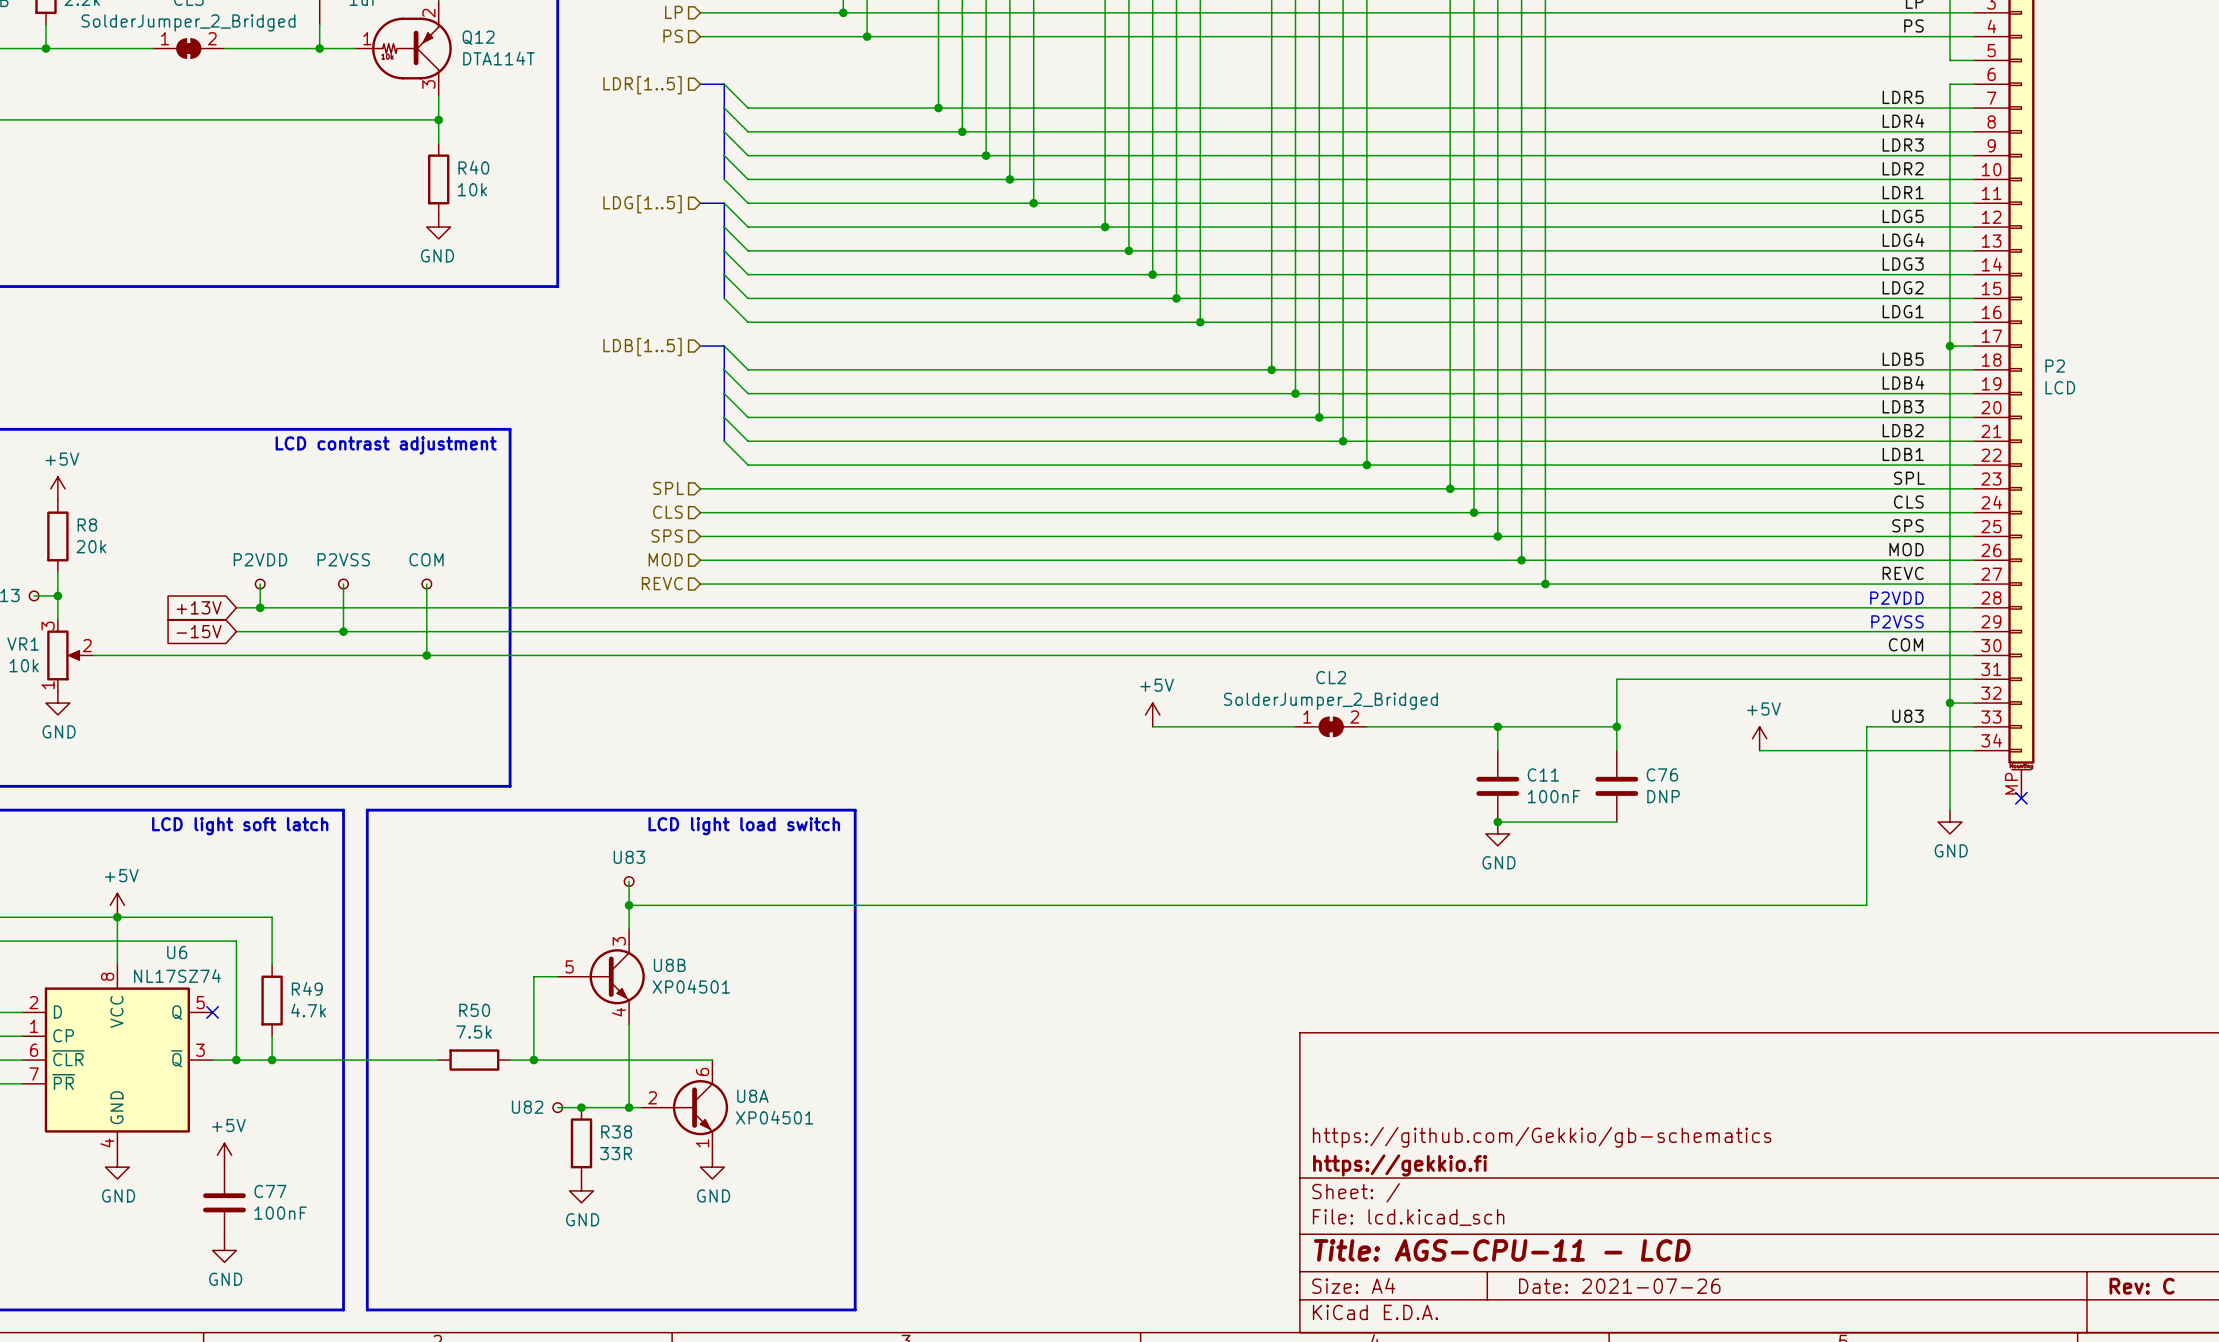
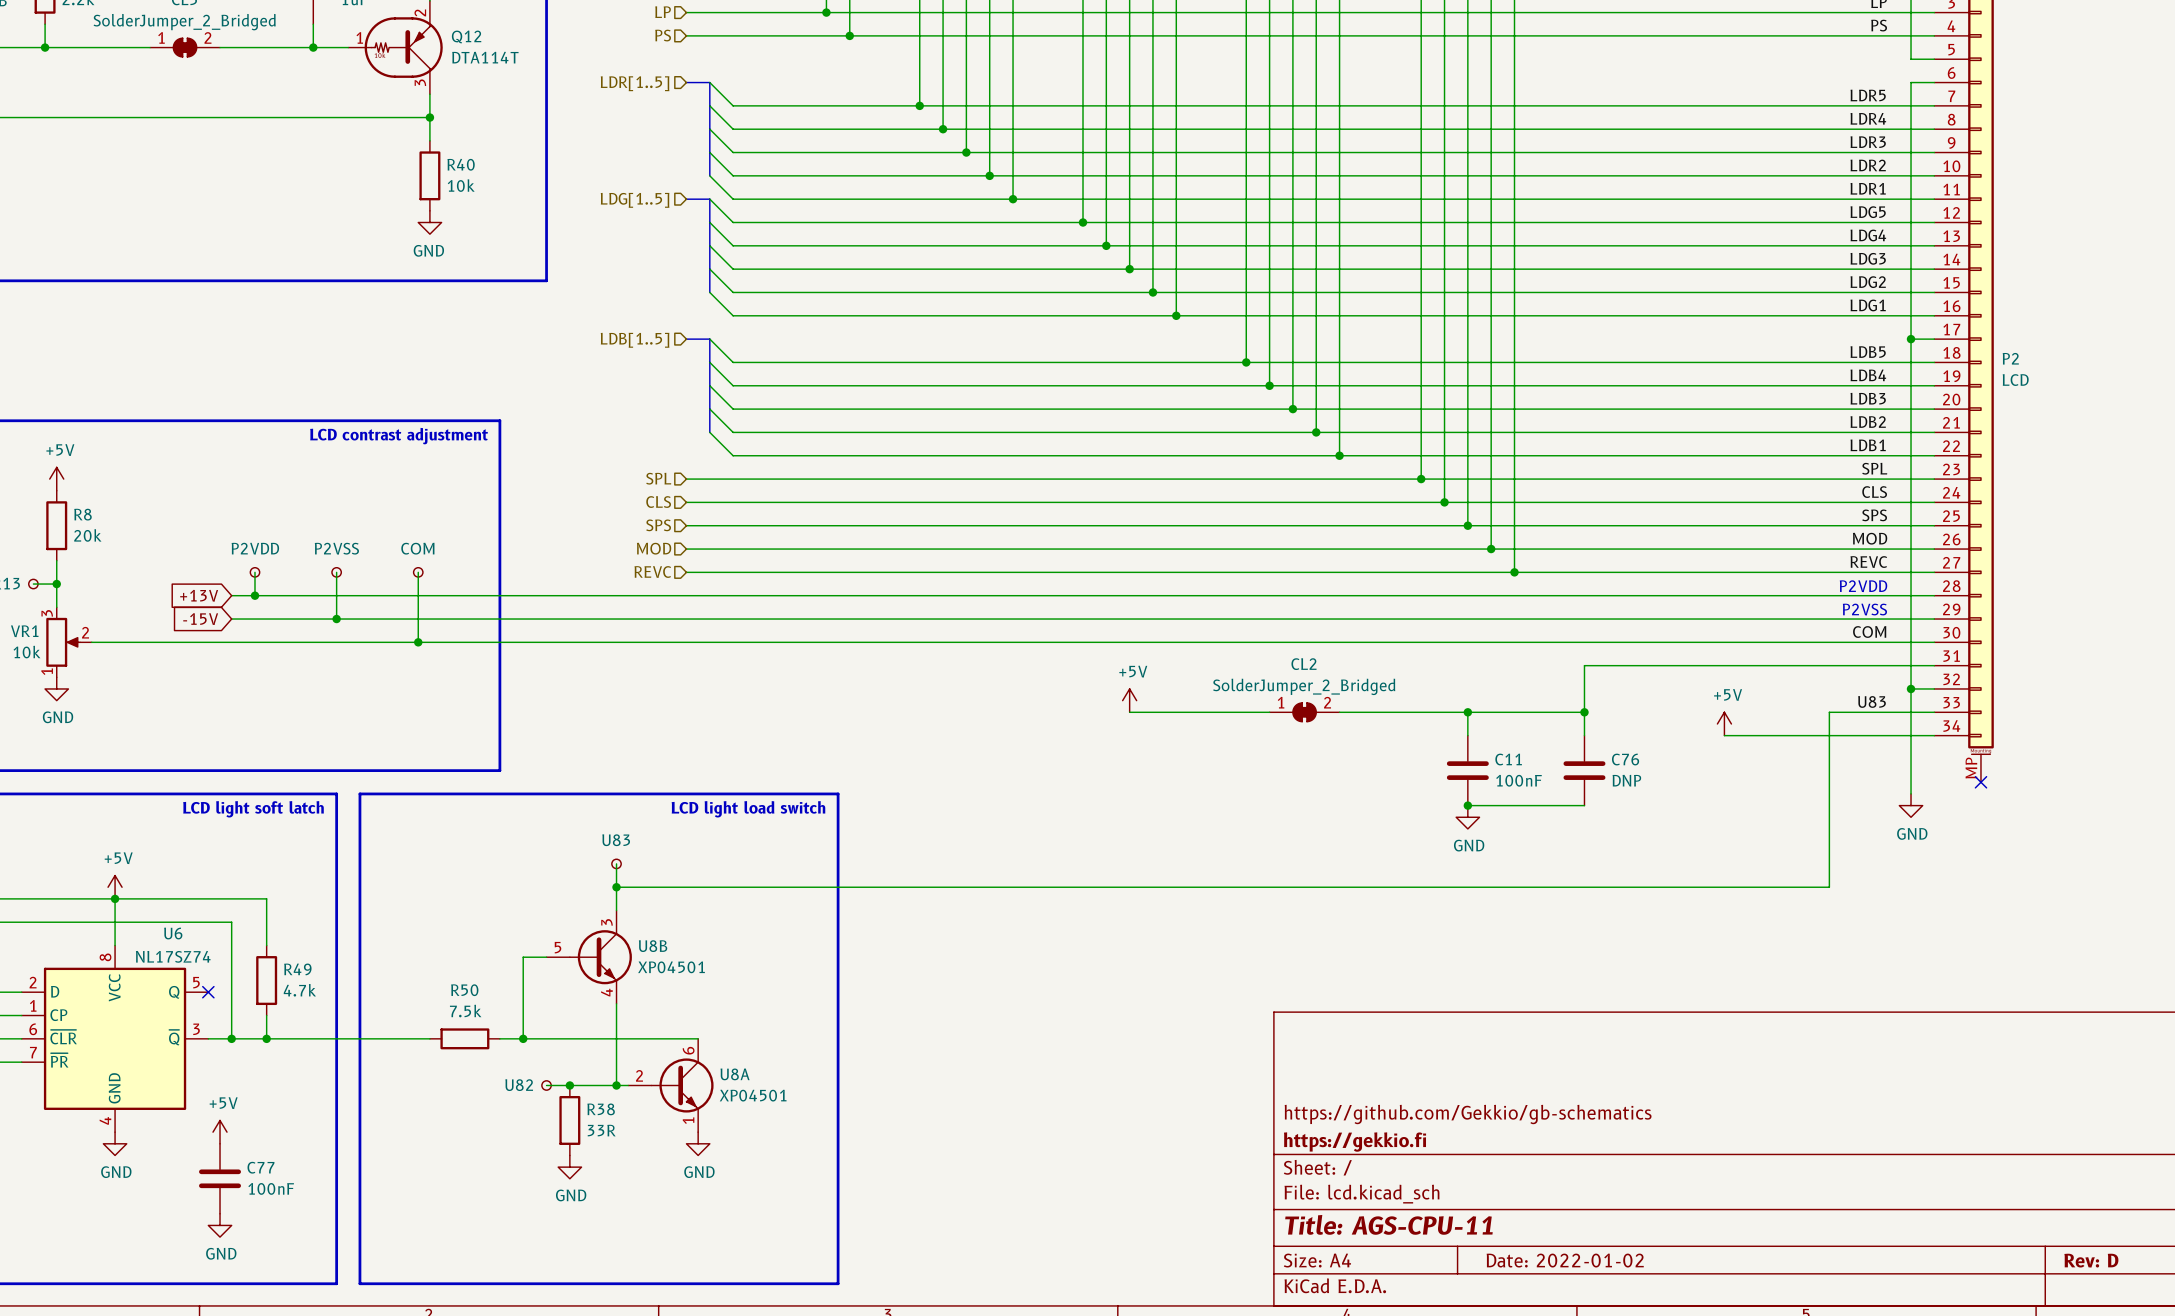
title block: Title: AGS-CPU-11 - LCD (1502, 1250) -> Title: AGS-CPU-11 (1388, 1224)
title block: Date: 2021-07-26 (1619, 1286) -> Date: 2022-01-02 (1565, 1260)
title block: Rev: C (2142, 1286) -> Rev: D (2091, 1260)

